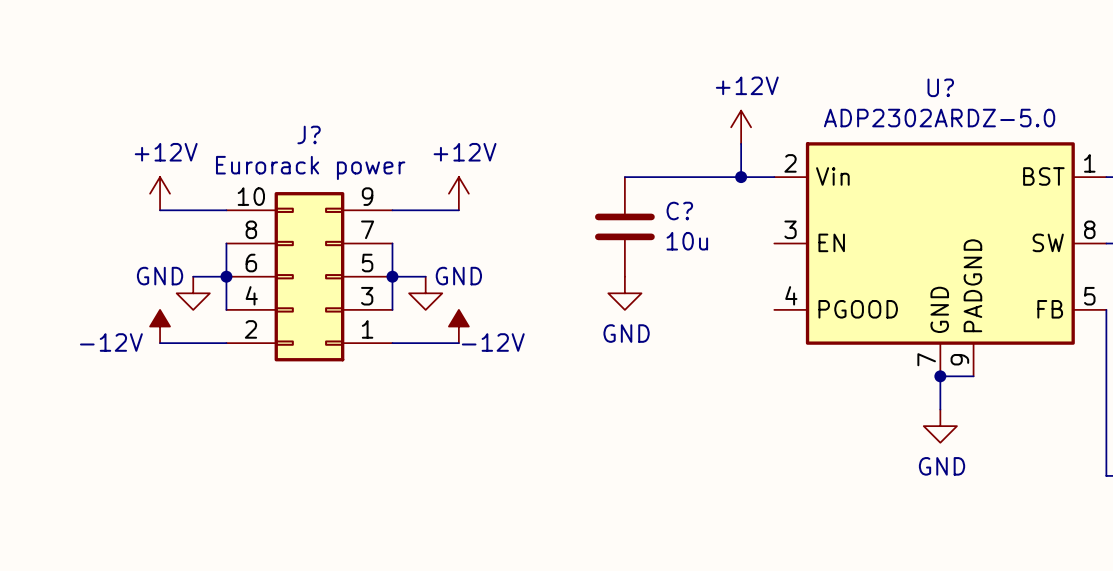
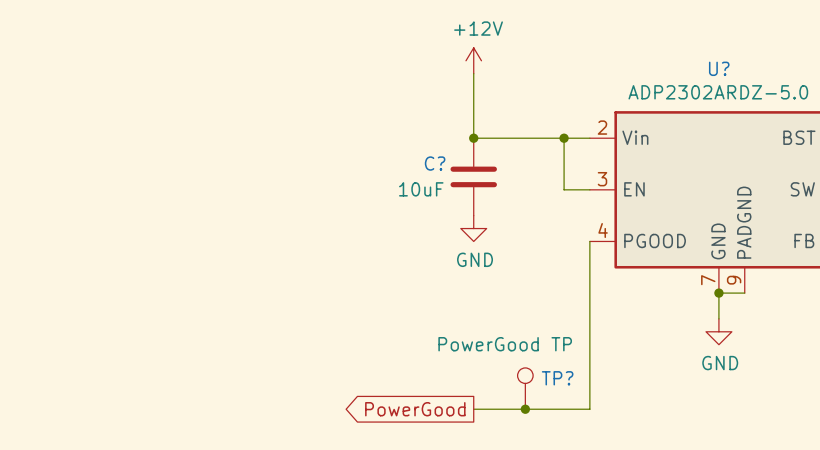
power symbol: none -> +12V (473, 60)
wire: none -> (473, 73) (473, 138)
power symbol: +12V (741, 127) -> none
wire: (741, 143) (741, 177) -> (589, 189) (564, 189) (564, 138)
junction: none -> (473, 138)
power symbol: +12V (160, 193) -> none
power symbol: +12V (458, 193) -> none
wire: (160, 210) (226, 210) -> none
wire: (392, 210) (458, 210) -> none
C? name position: C? (679, 211) -> C? (435, 163)
C? value: 10u (687, 241) -> 10uF (421, 189)
wire: (226, 243) (226, 309) -> none
wire: (392, 243) (392, 309) -> none
wire: (193, 276) (226, 276) -> none
junction: (226, 276) -> none
J?: Eurorack power (309, 276) -> none
wire: (392, 276) (425, 276) -> none
junction: (392, 276) -> none
power symbol: GND (193, 293) -> none
power symbol: GND (425, 293) -> none
wire: none -> (589, 241) (589, 409) (473, 409)
power symbol: -12V (160, 326) -> none
power symbol: -12V (458, 326) -> none
wire: (160, 343) (226, 343) -> none
wire: (392, 343) (458, 343) -> none
TP?: none -> PowerGood TP (525, 388)
global label: none -> PowerGood (415, 409)
junction: none -> (525, 409)

